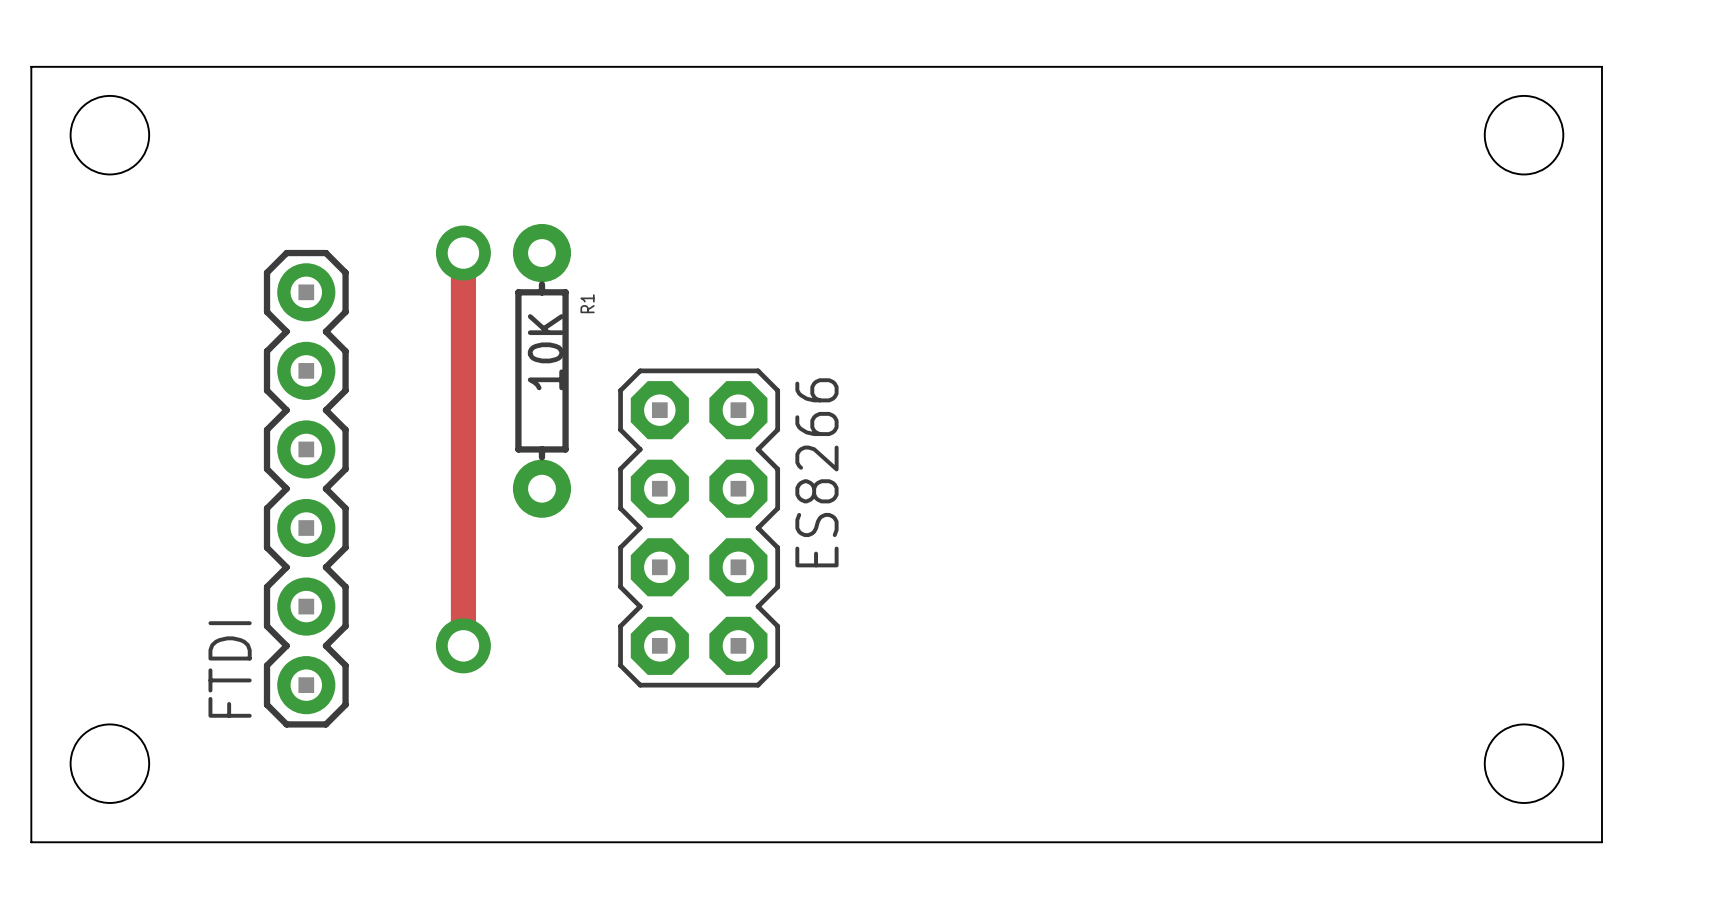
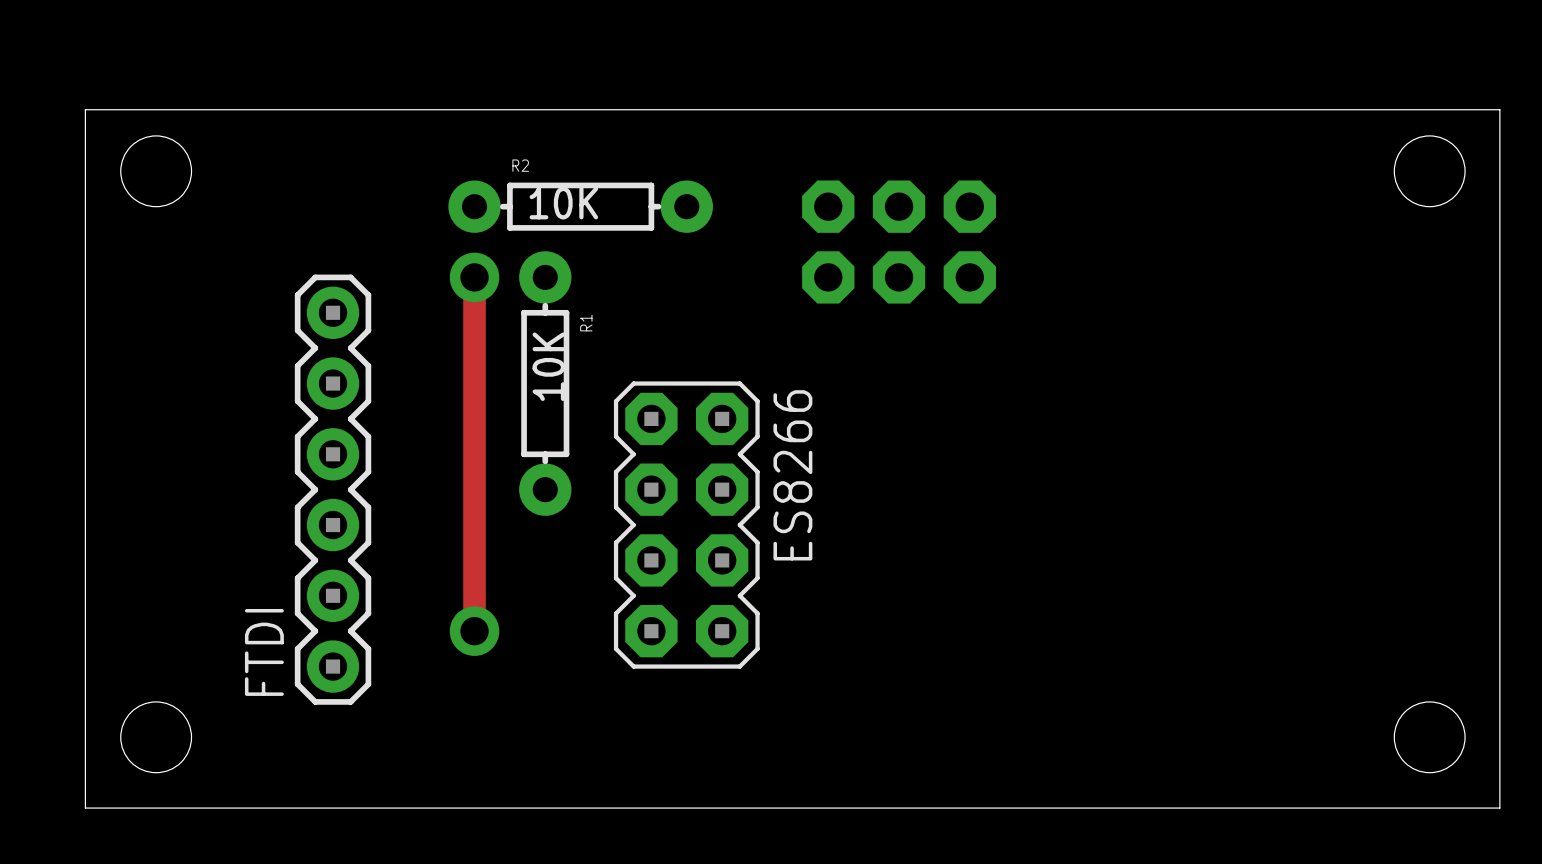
R2: none -> 10K (580, 206)
part: none -> (899, 242)

